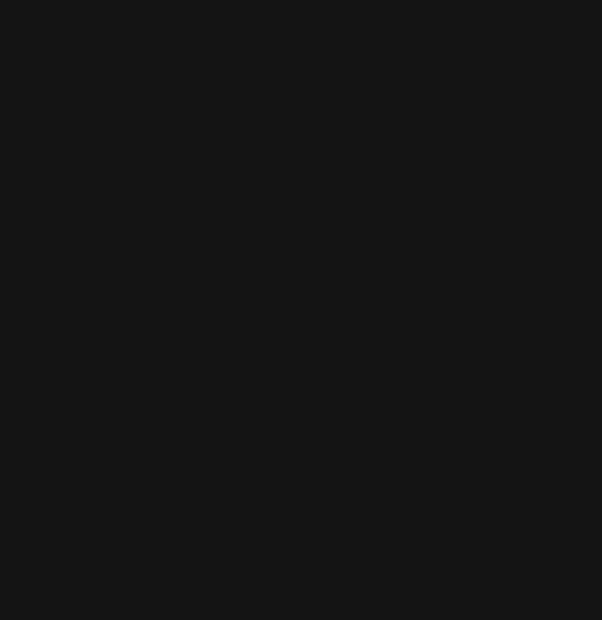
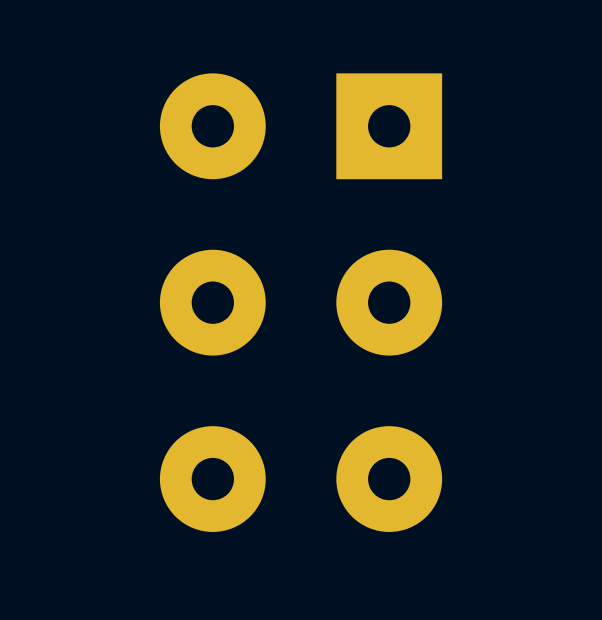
part: none -> (301, 302)

